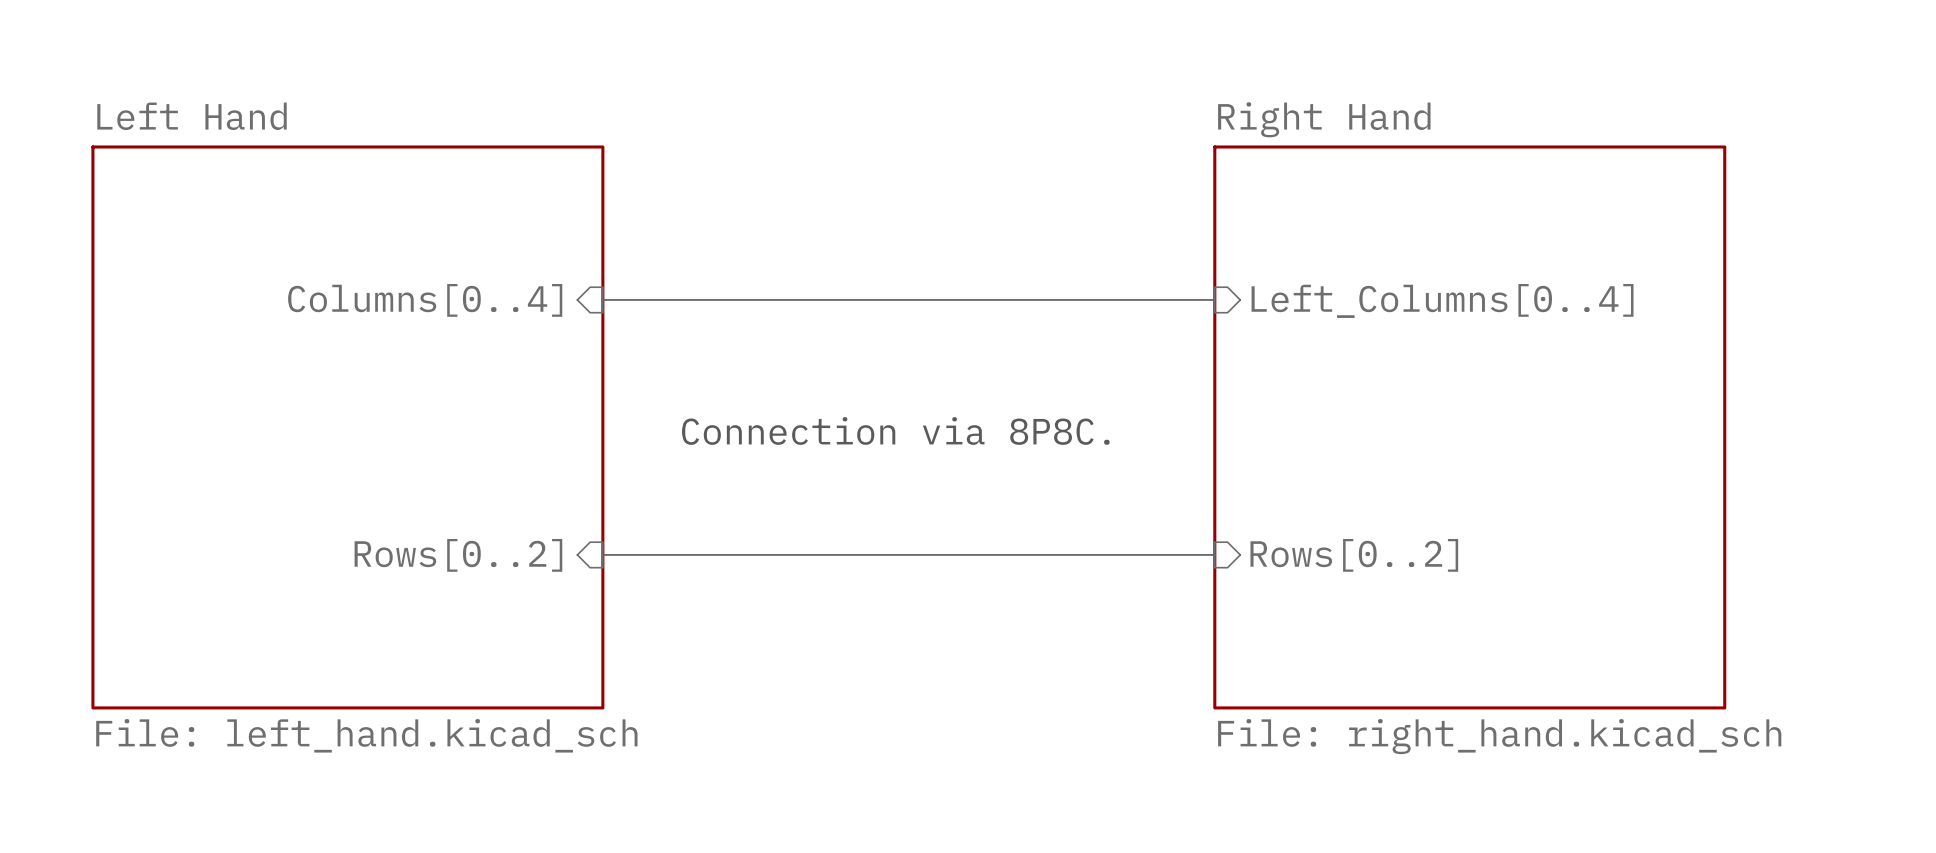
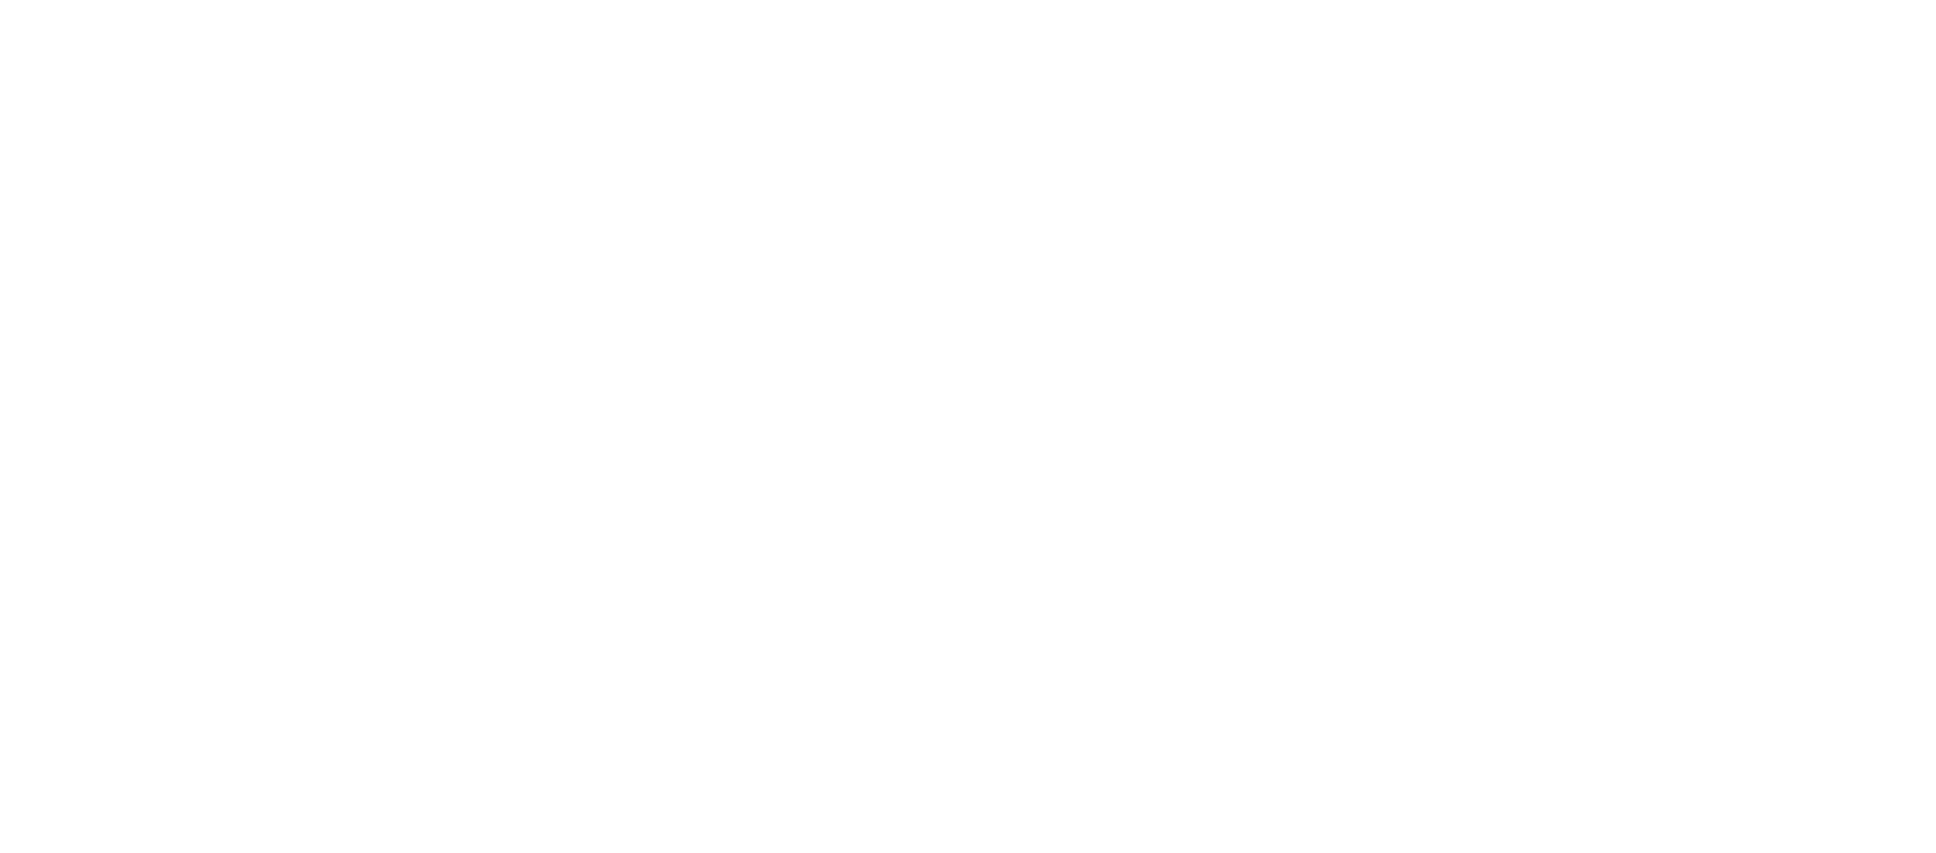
bus: (602, 299) (1214, 299) -> none
sheet pin: Columns[0..4] (425, 300) -> none
sheet pin: Left_Columns[0..4] (1442, 300) -> none
sheet Left Hand: File: left_hand.kicad_sch (347, 427) -> none
sheet Right Hand: File: right_hand.kicad_sch (1469, 427) -> none
text: Connection via 8P8C. (895, 430) -> none
bus: (602, 554) (1214, 554) -> none
sheet pin: Rows[0..2] (458, 555) -> none
sheet pin: Rows[0..2] (1354, 555) -> none

